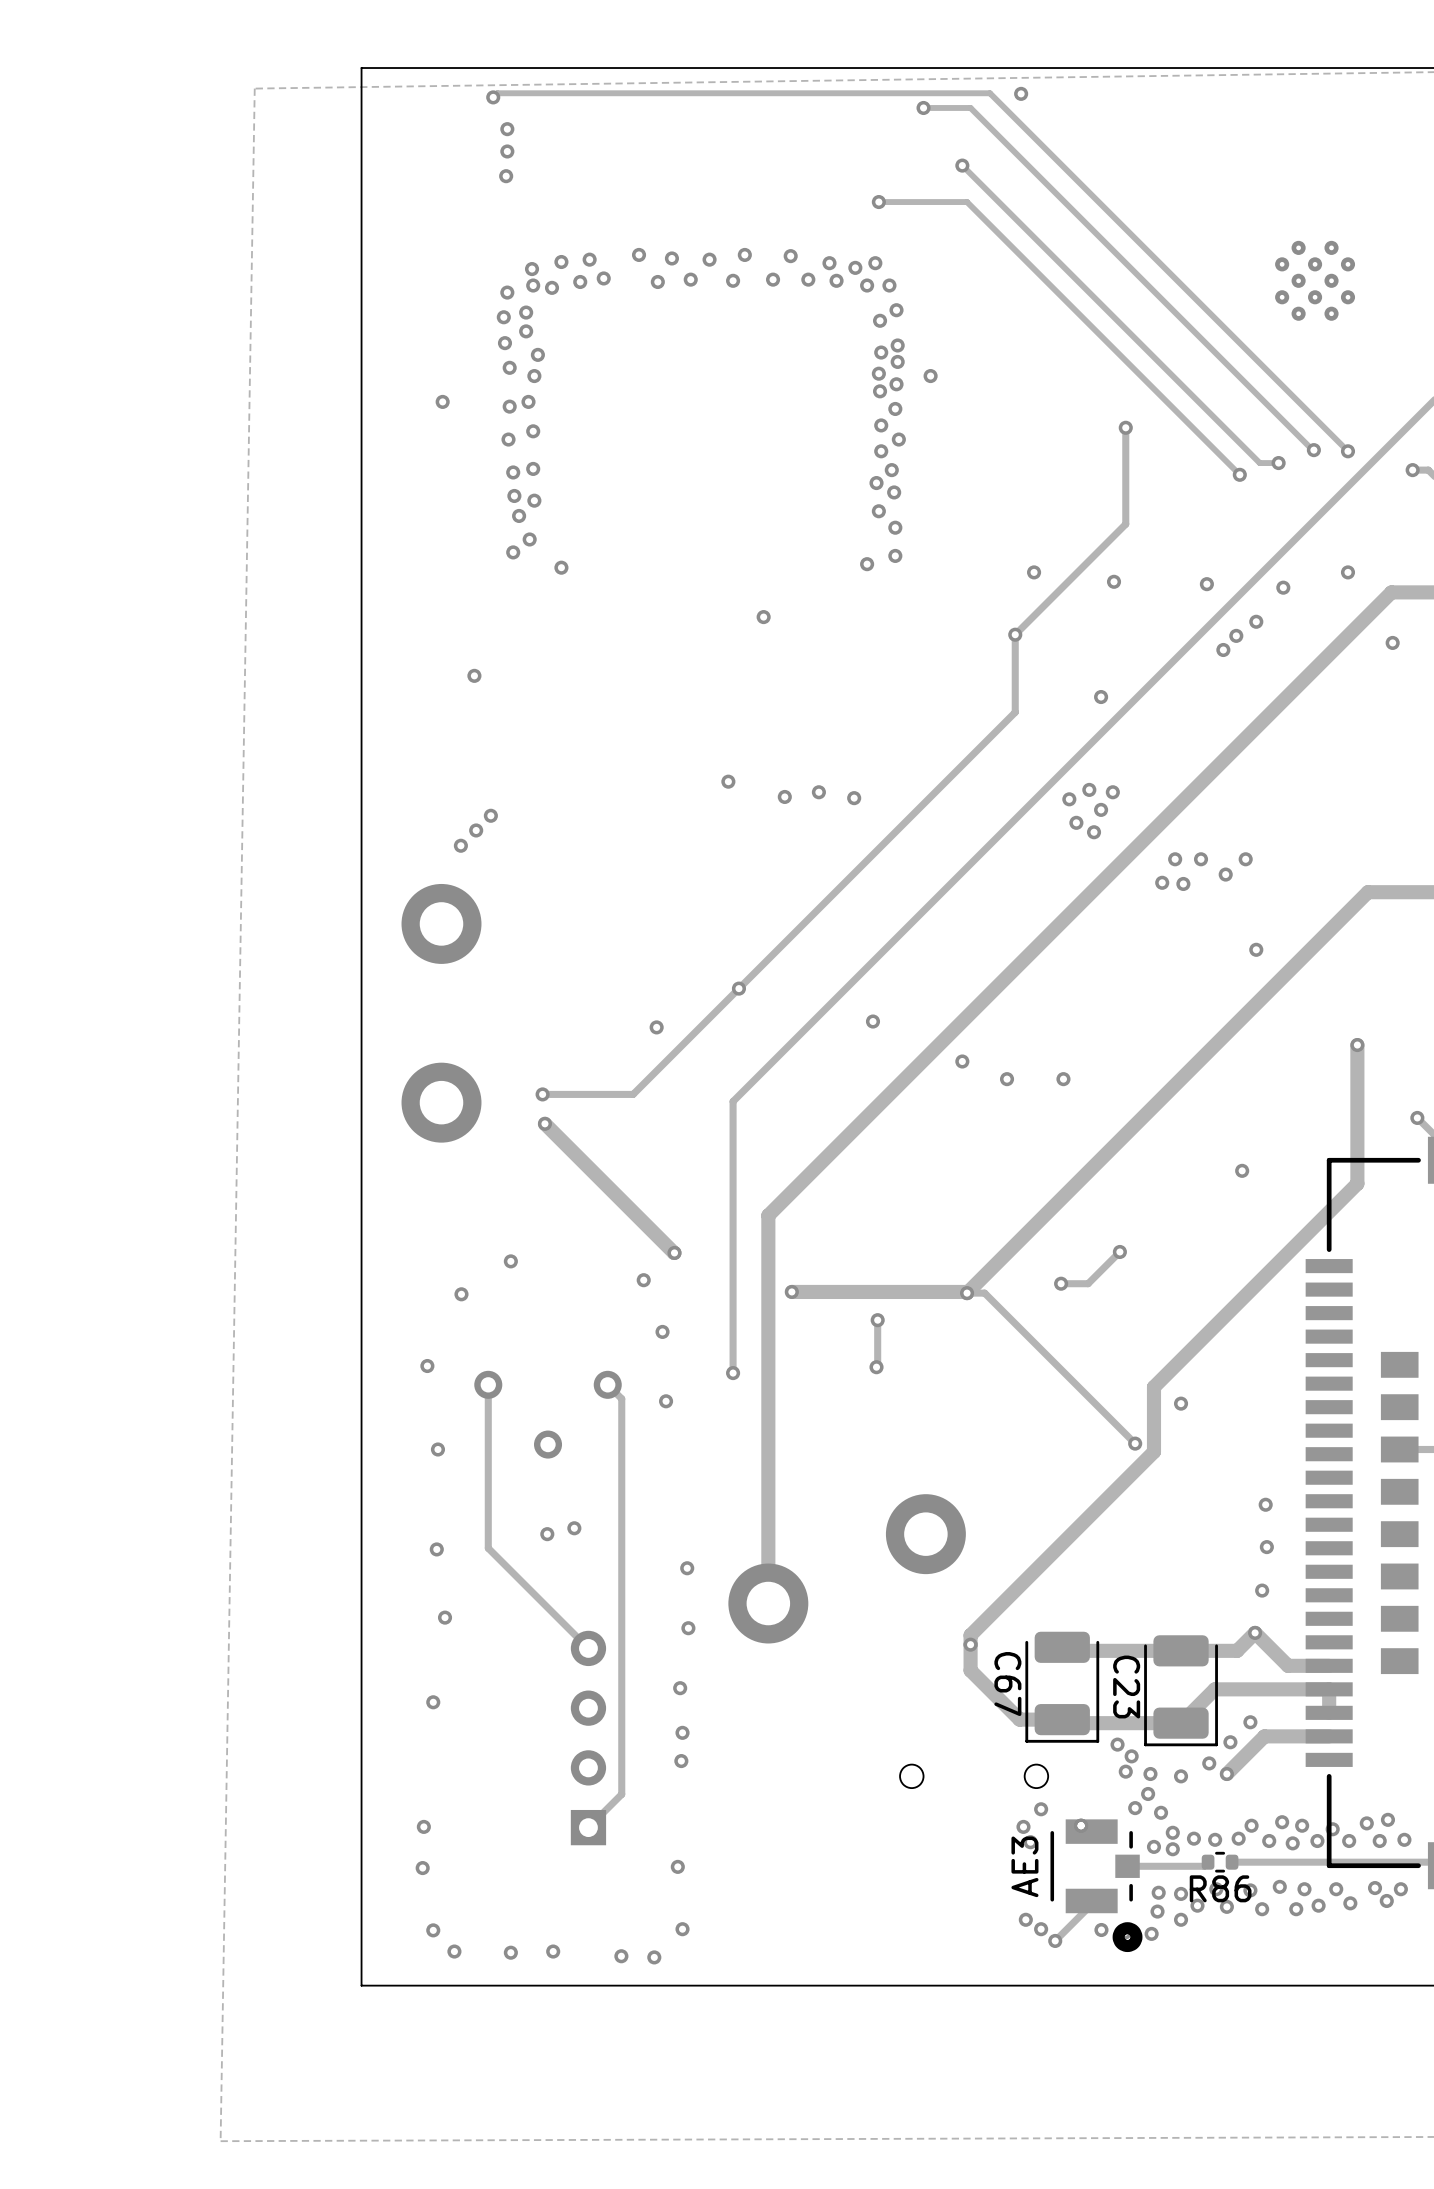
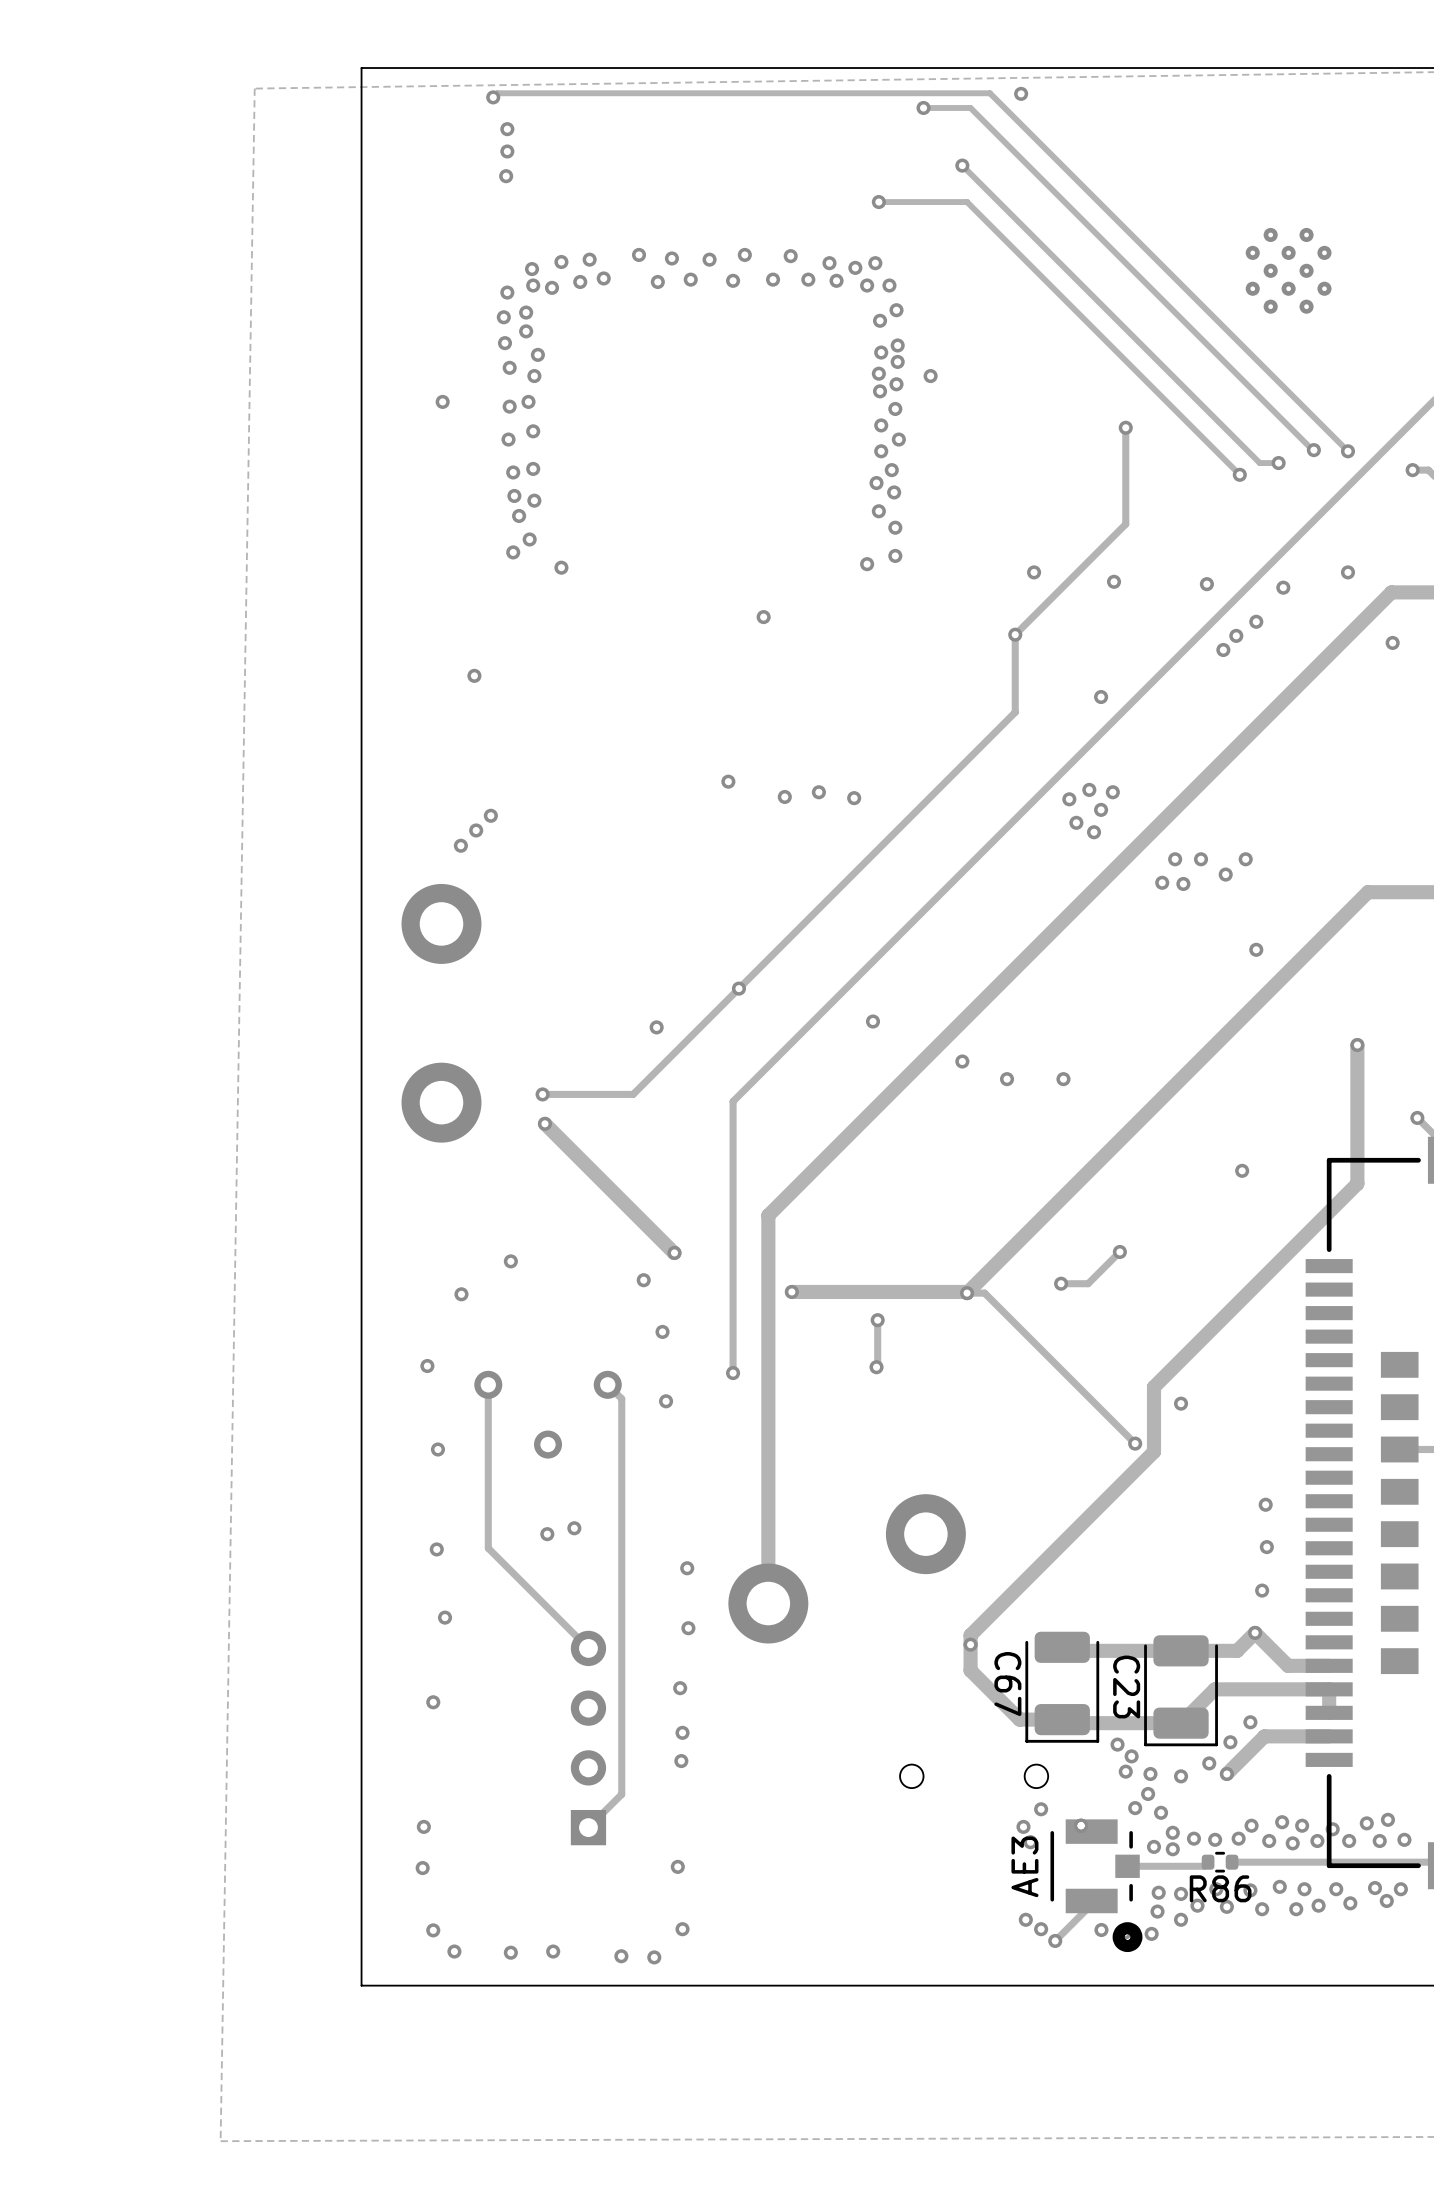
part: none -> (1288, 270)
part: (1315, 280) -> none

